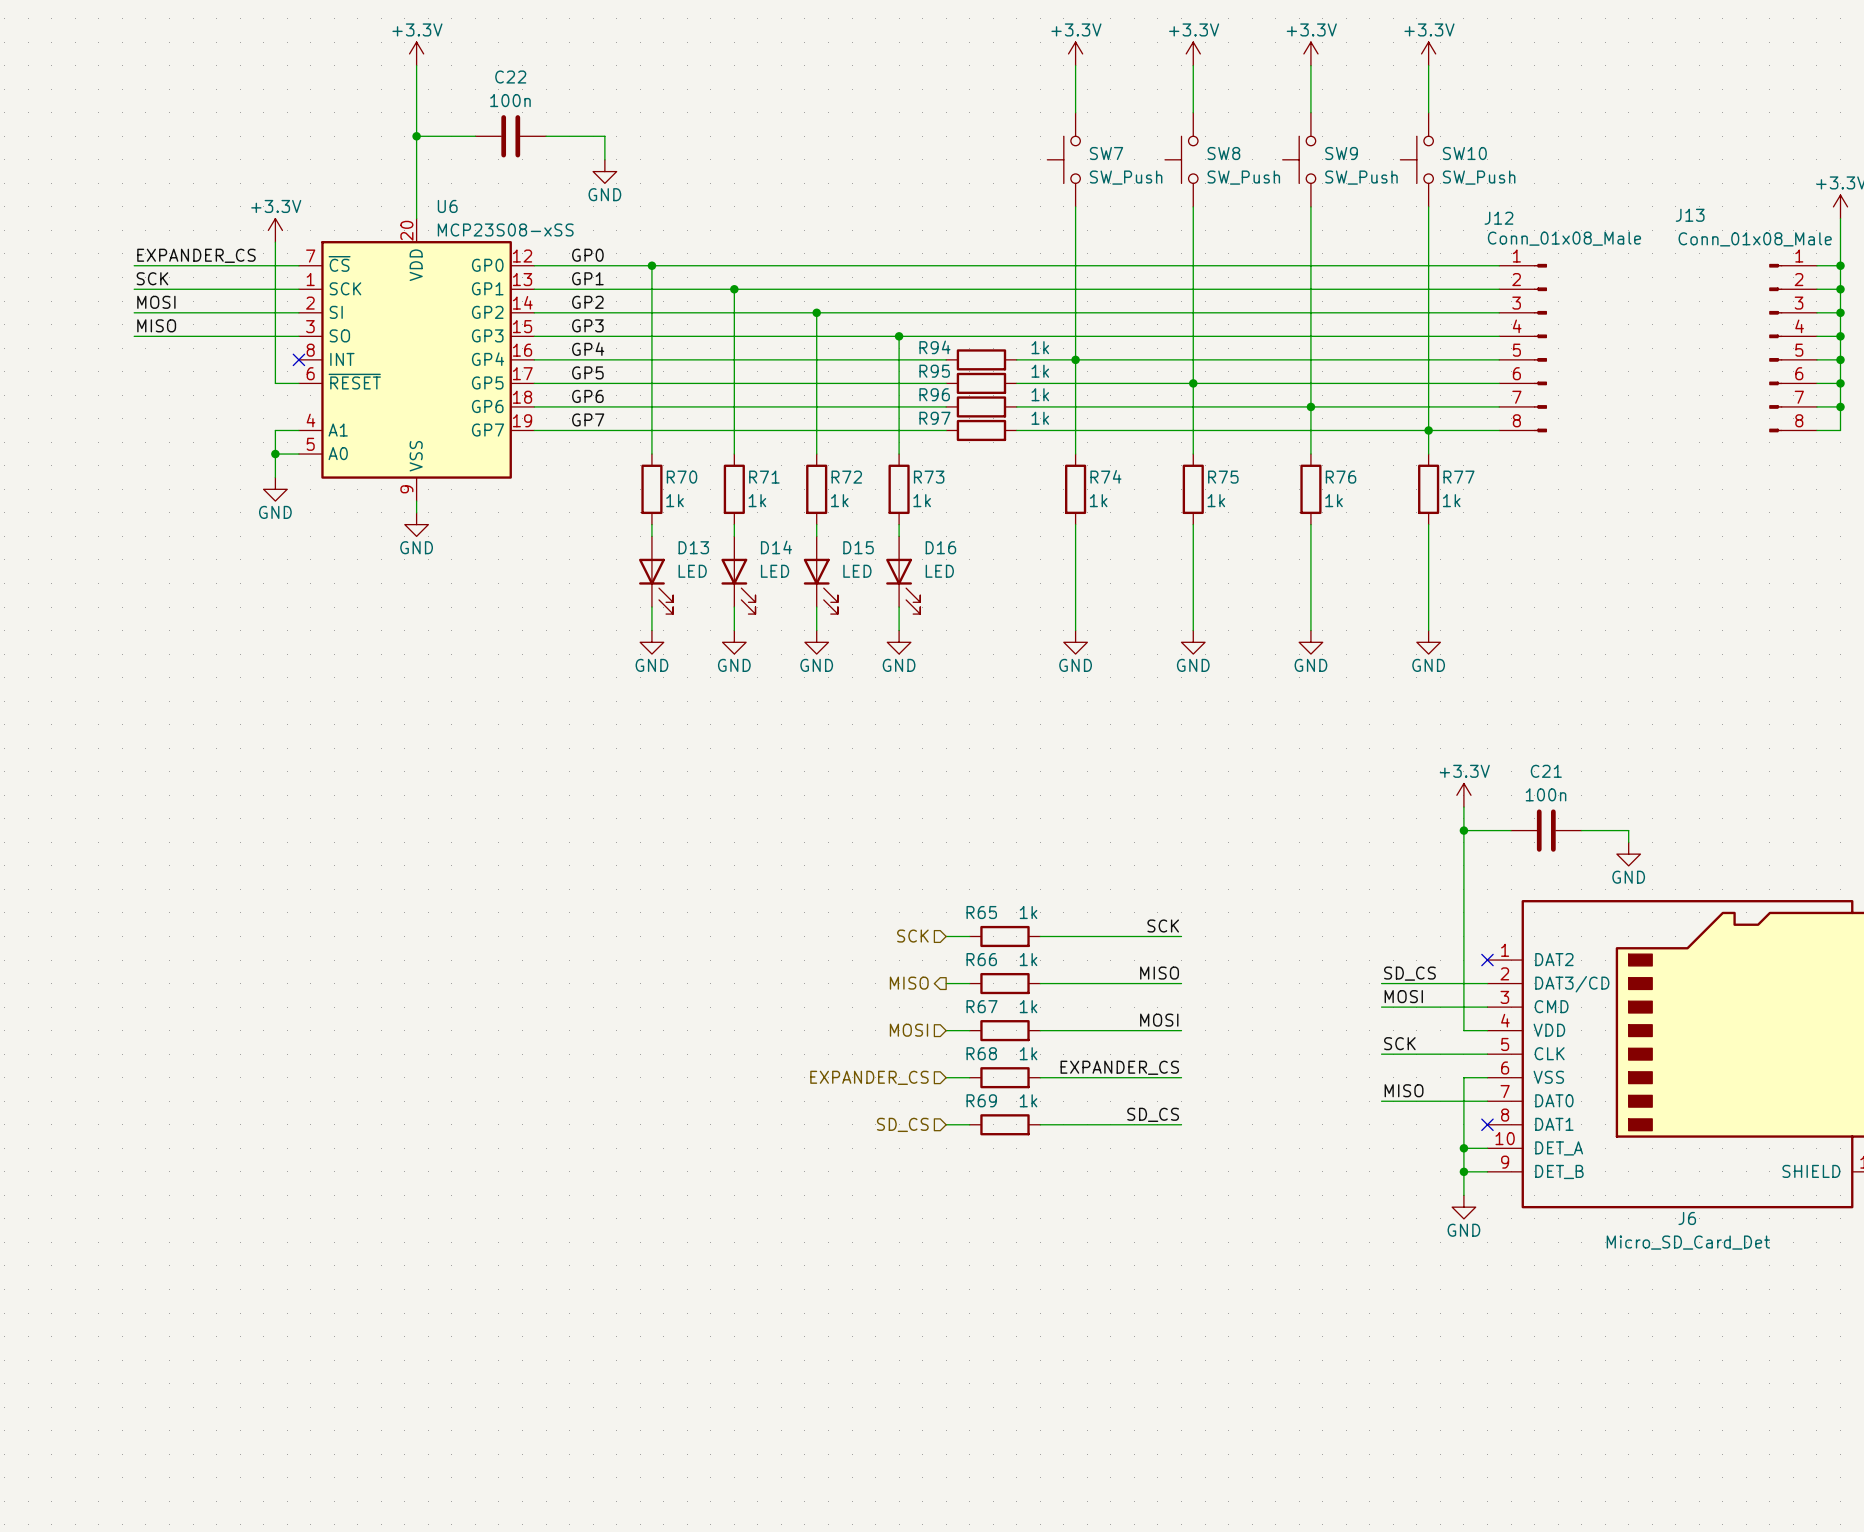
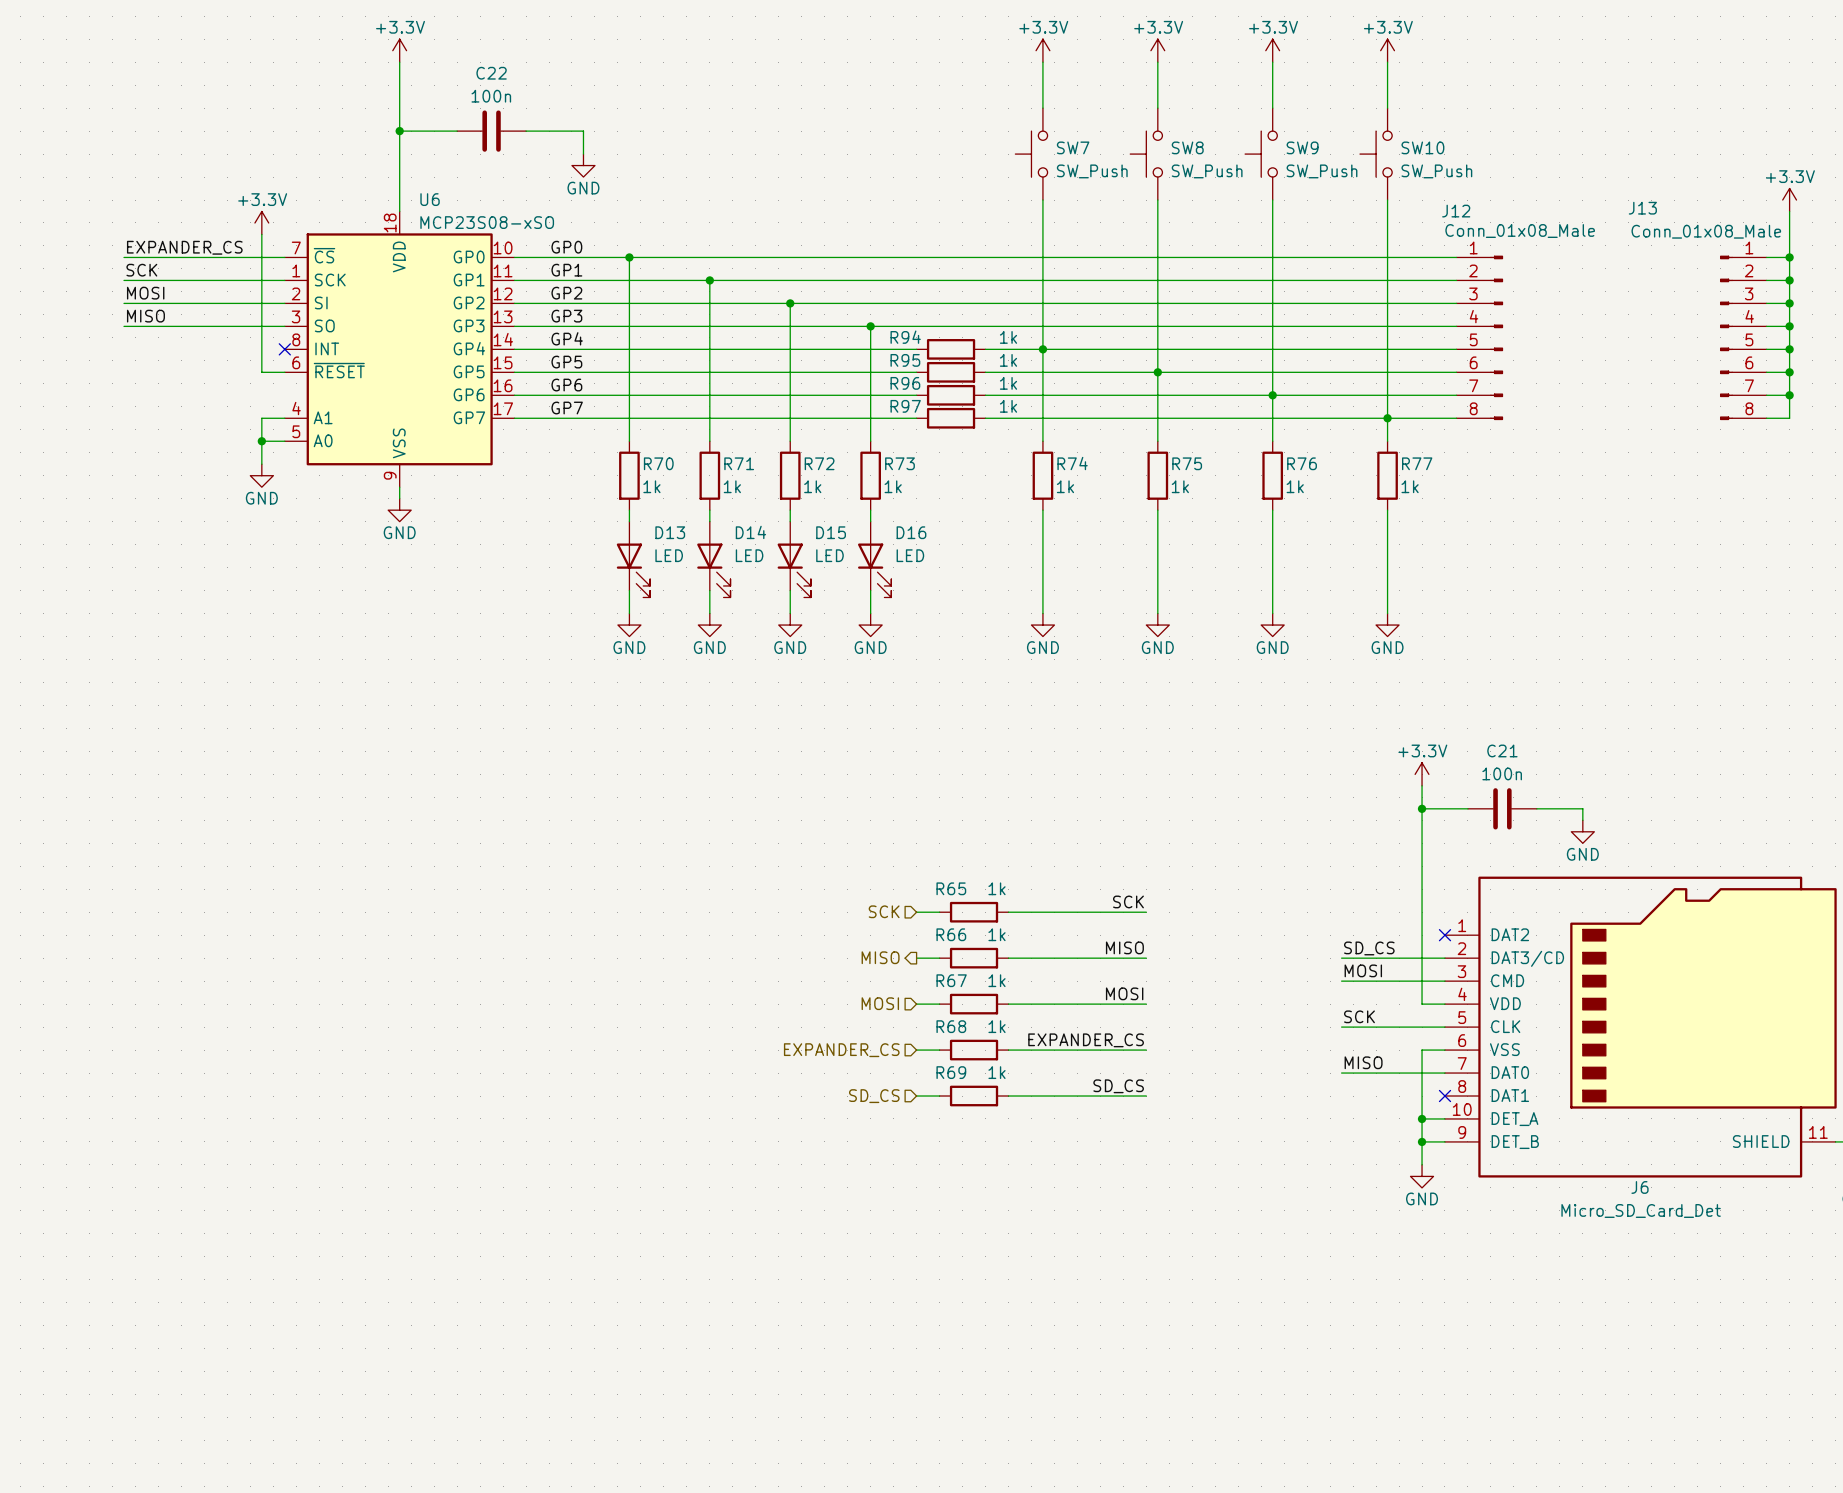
U6 symbol: [298, 218, 535, 502] -> [284, 211, 515, 488]
U6 value: MCP23S08-xSS (505, 229) -> MCP23S08-xSO (487, 222)

